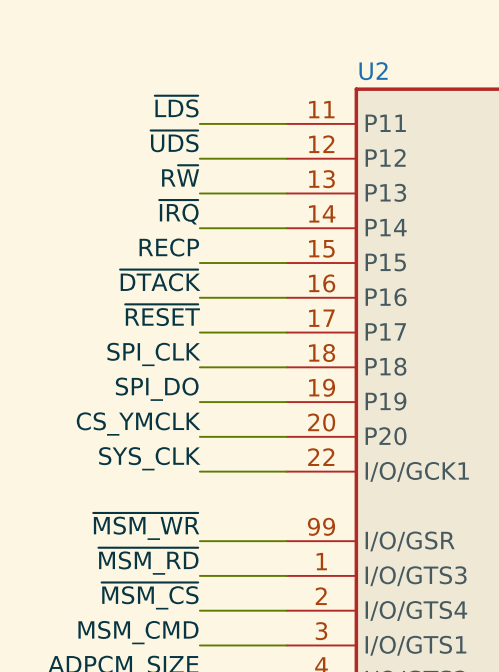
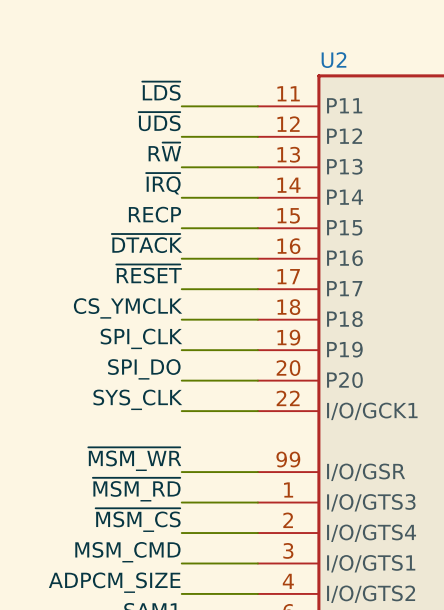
label: SPI_CLK (153, 354) -> CS_YMCLK (128, 308)
label: SPI_DO (157, 389) -> SPI_CLK (141, 338)
label: CS_YMCLK (138, 423) -> SPI_DO (144, 369)

